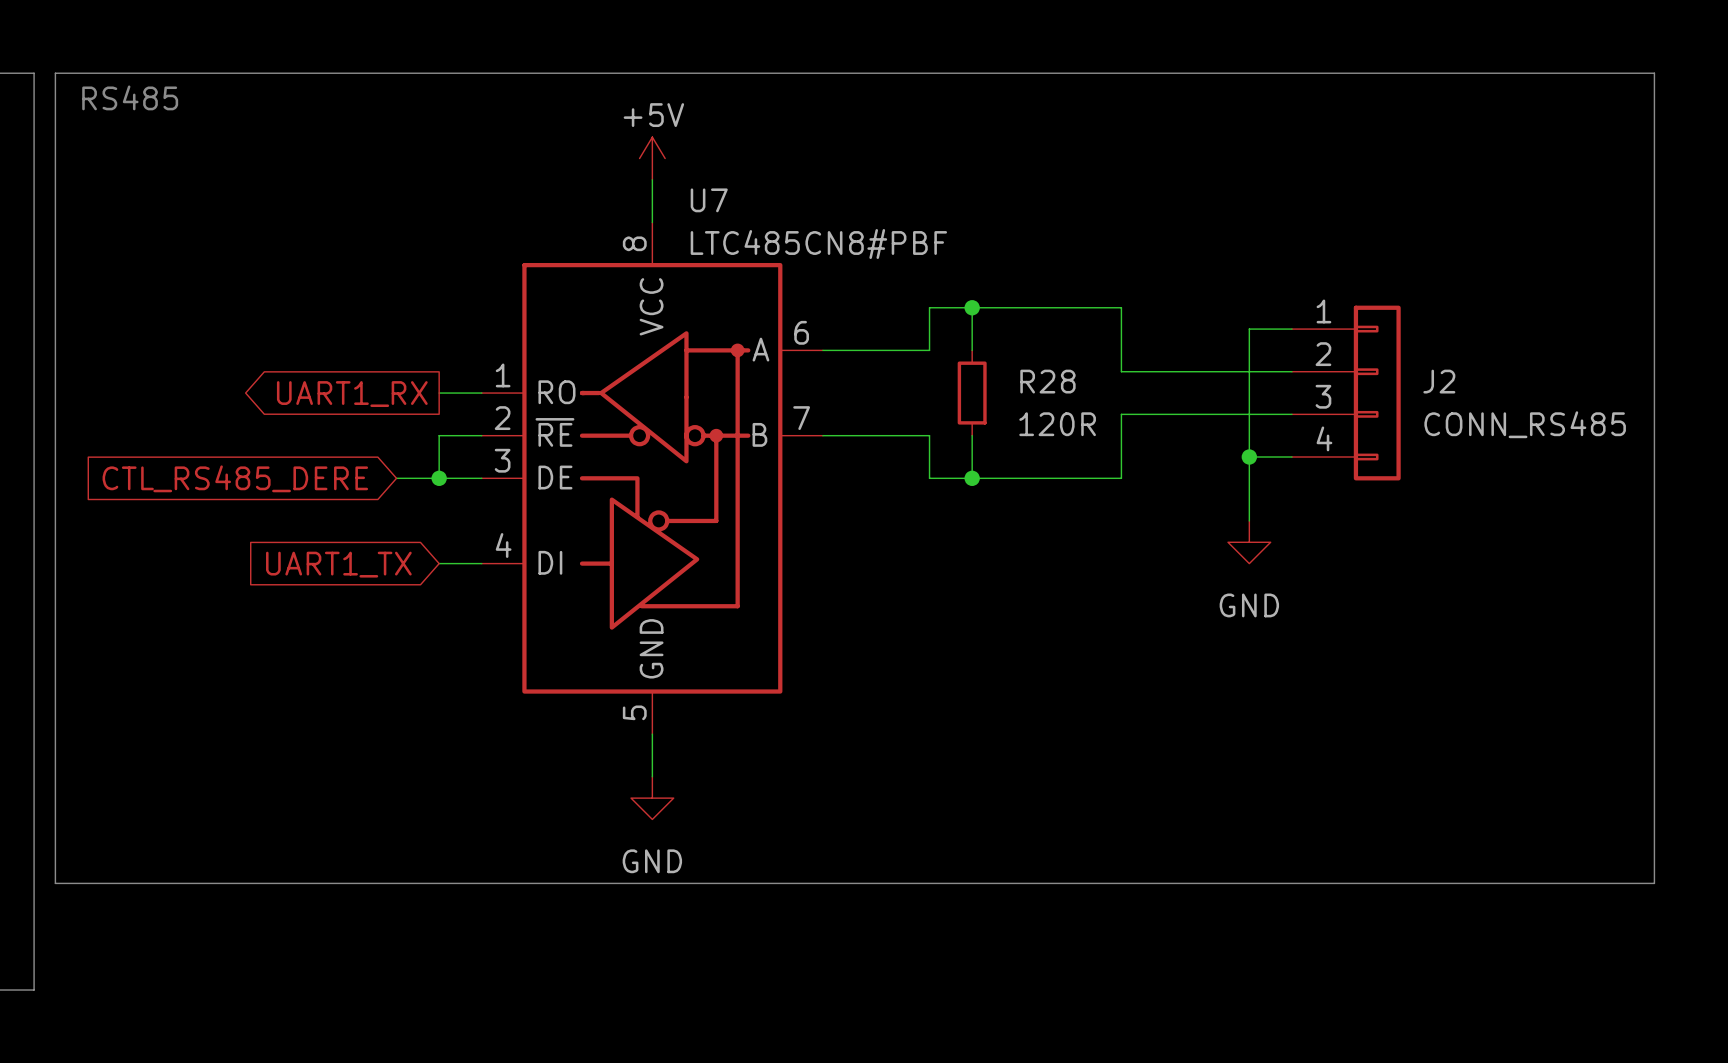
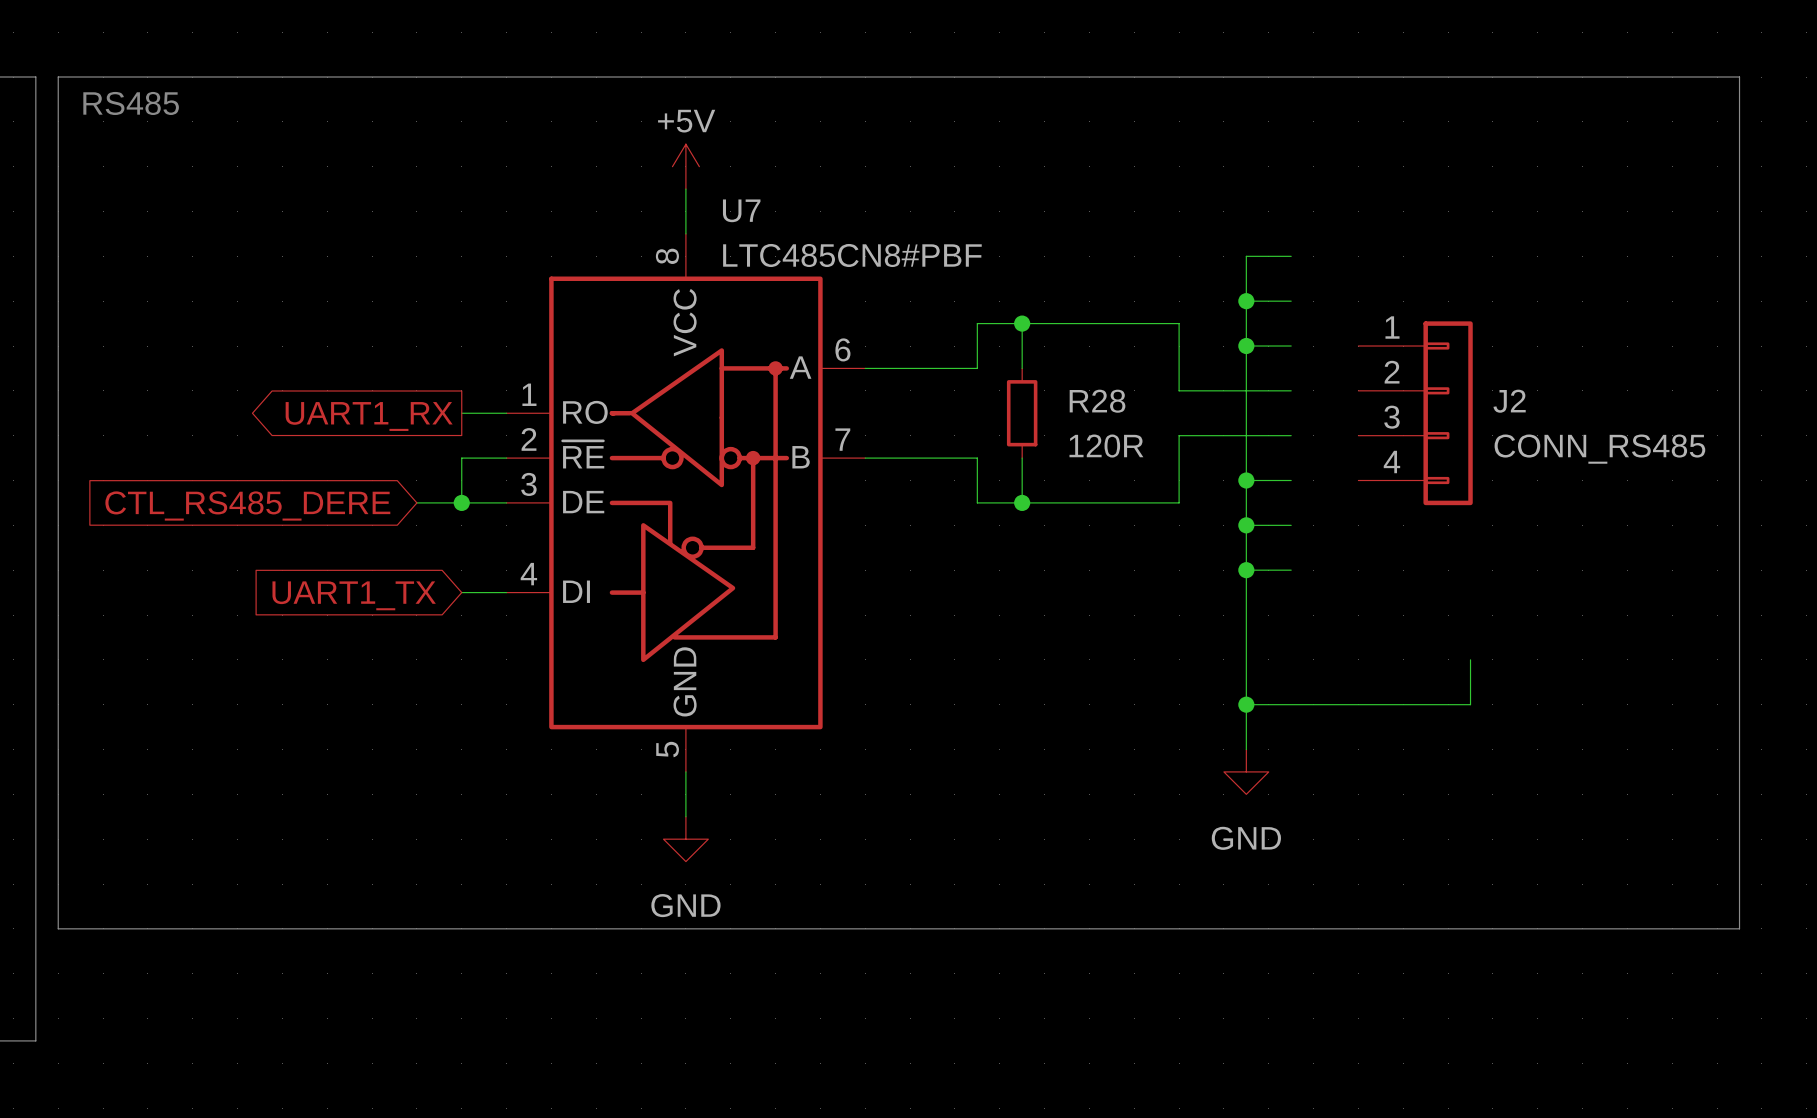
wire: none -> (1291, 256) (1246, 256) (1246, 749)
wire: none -> (1246, 301) (1291, 301)
junction: none -> (1246, 301)
wire: none -> (1246, 346) (1291, 346)
junction: none -> (1246, 346)
wire: (1291, 329) (1249, 329) (1249, 520) -> none
wire: (1228, 371) (1291, 371) -> none
wire: (1228, 414) (1291, 414) -> none
junction: none -> (1246, 480)
wire: (1249, 457) (1291, 457) -> (1246, 480) (1291, 480)
junction: (1249, 457) -> none
wire: none -> (1246, 525) (1291, 525)
junction: none -> (1246, 525)
wire: none -> (1246, 570) (1291, 570)
junction: none -> (1246, 570)
power symbol position: GND (1249, 542) -> GND (1246, 771)
wire: none -> (1470, 659) (1470, 704) (1246, 704)
junction: none -> (1246, 704)

